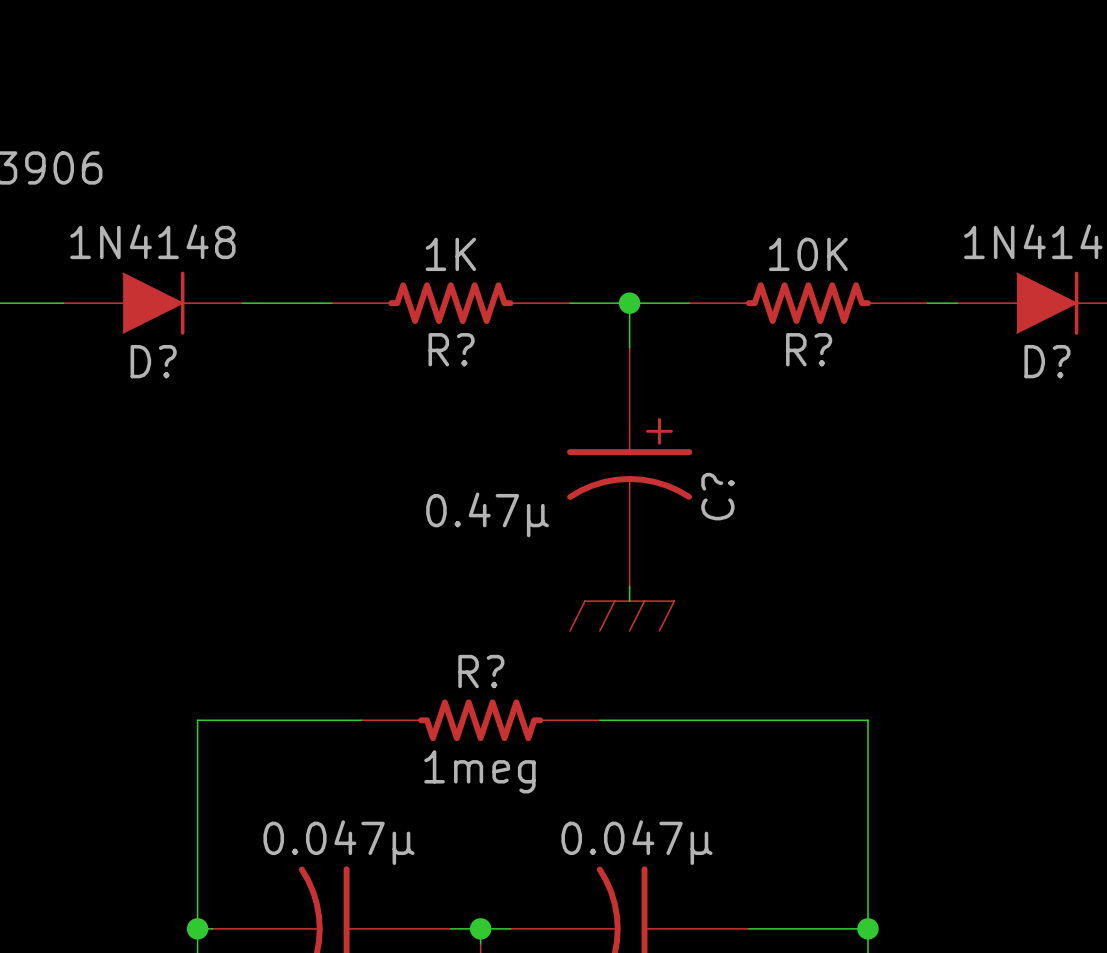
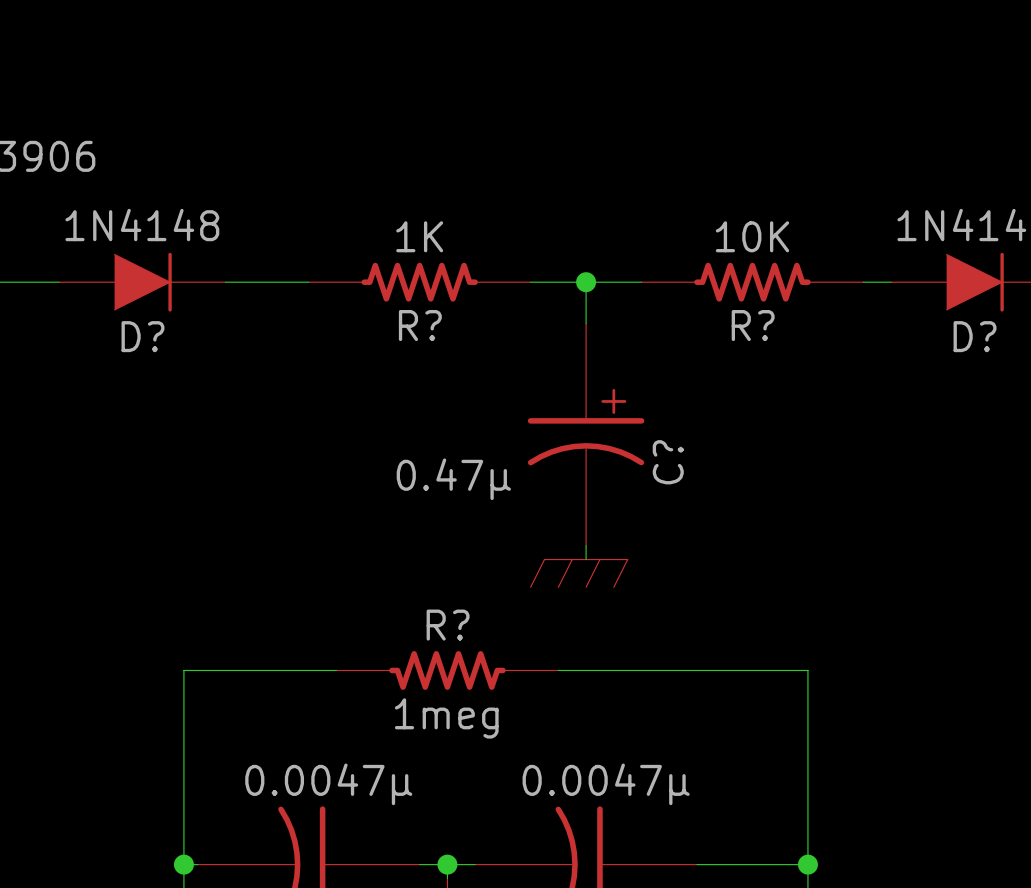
part value: 0.047μ (339, 842) -> 0.0047μ (328, 784)
part value: 0.047μ (636, 842) -> 0.0047μ (606, 784)

